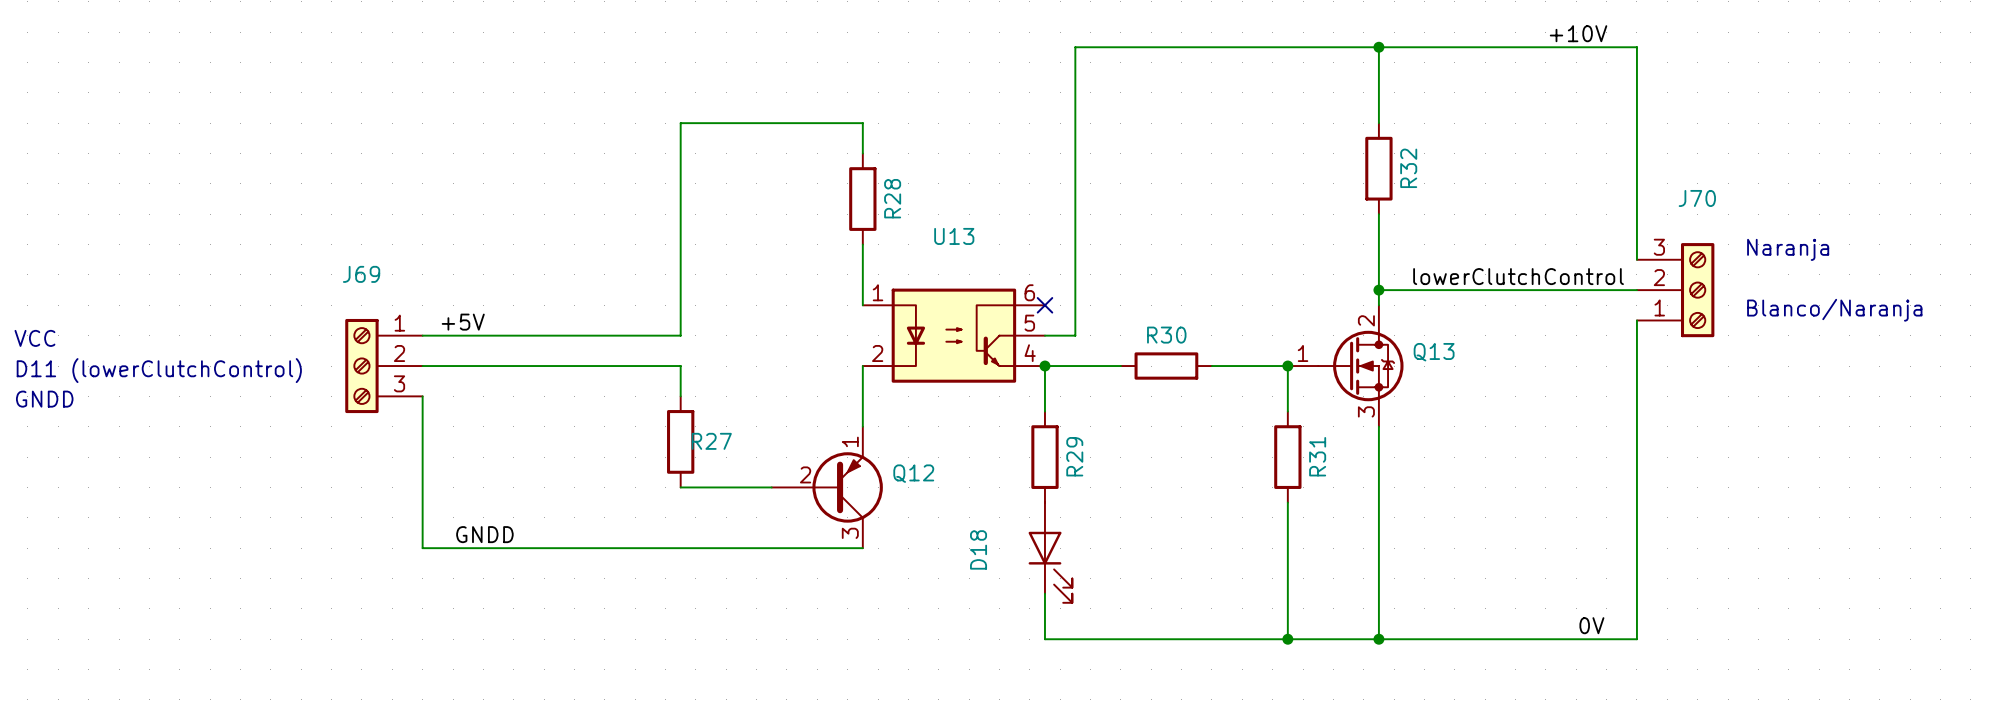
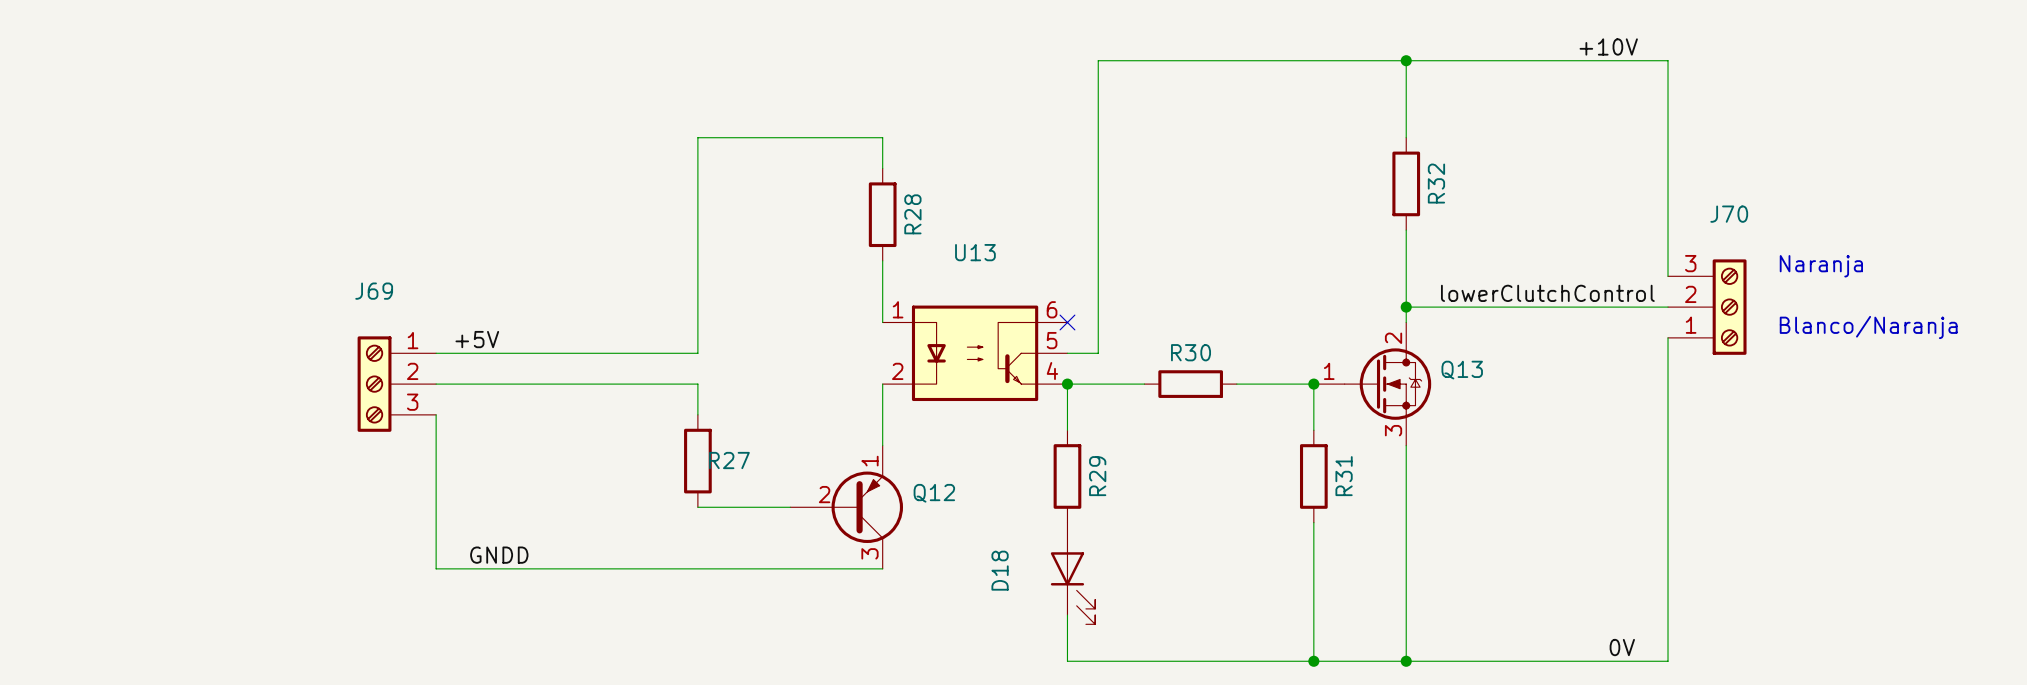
text: VCC (34, 338) -> none
text: D11 (lowerClutchControl) (159, 370) -> none
text: GNDD (44, 399) -> none

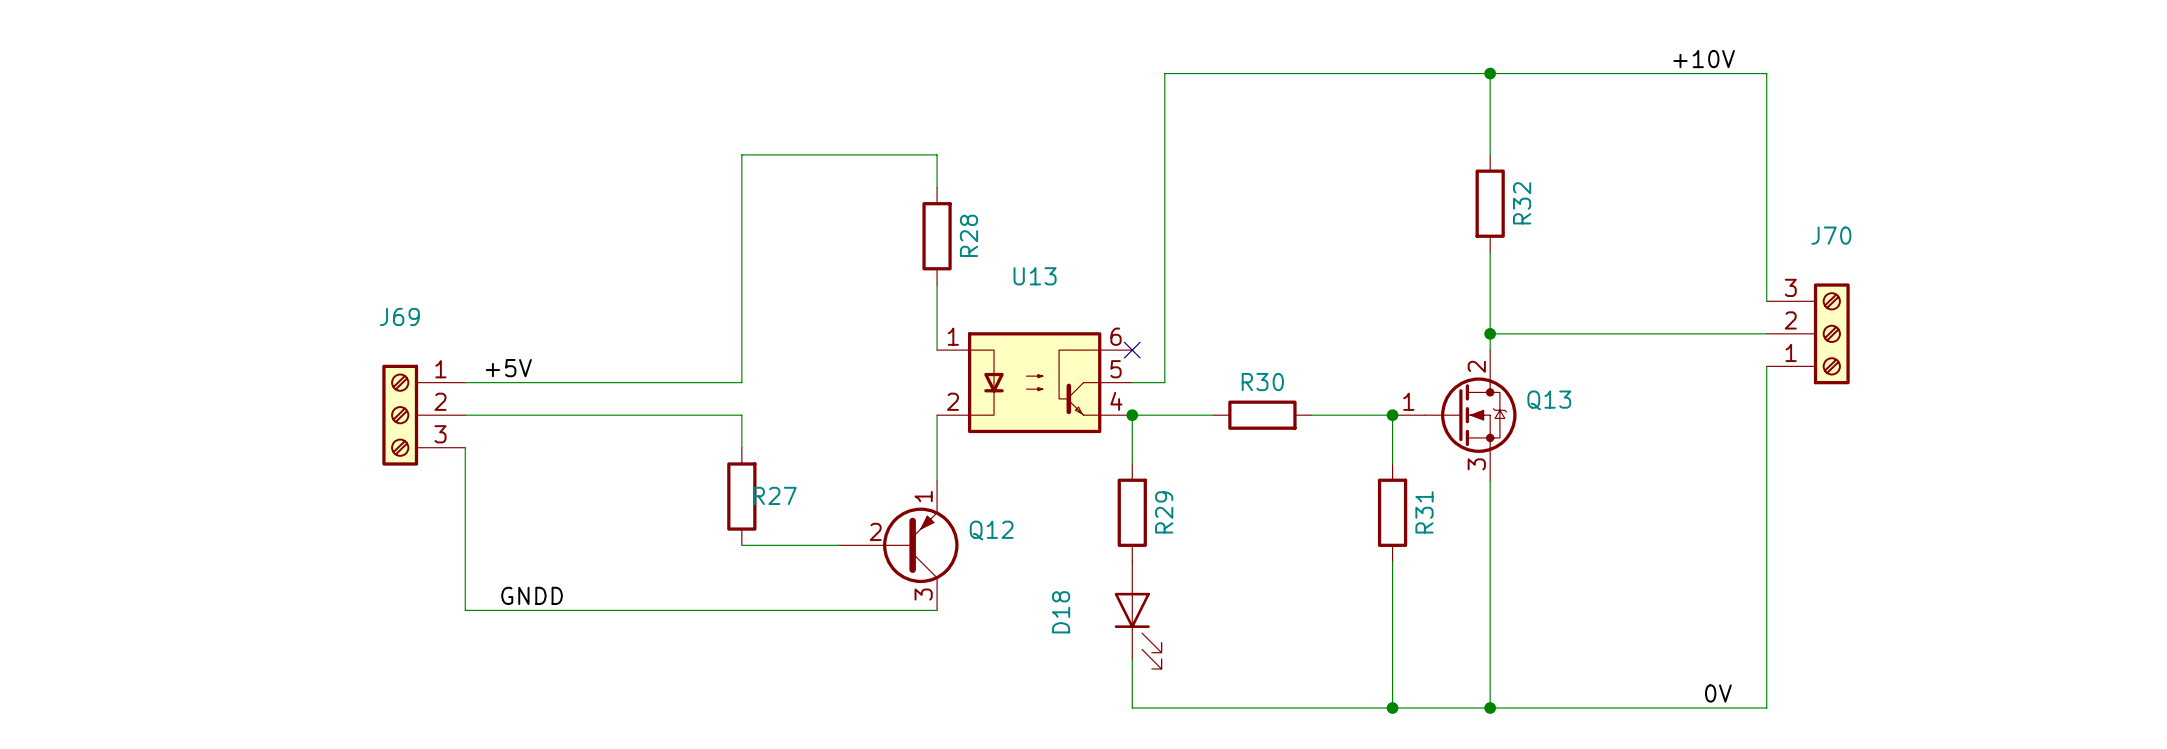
text: Naranja (1821, 266) -> none
label: lowerClutchControl (1547, 293) -> none
text: Blanco/Naranja (1868, 327) -> none

